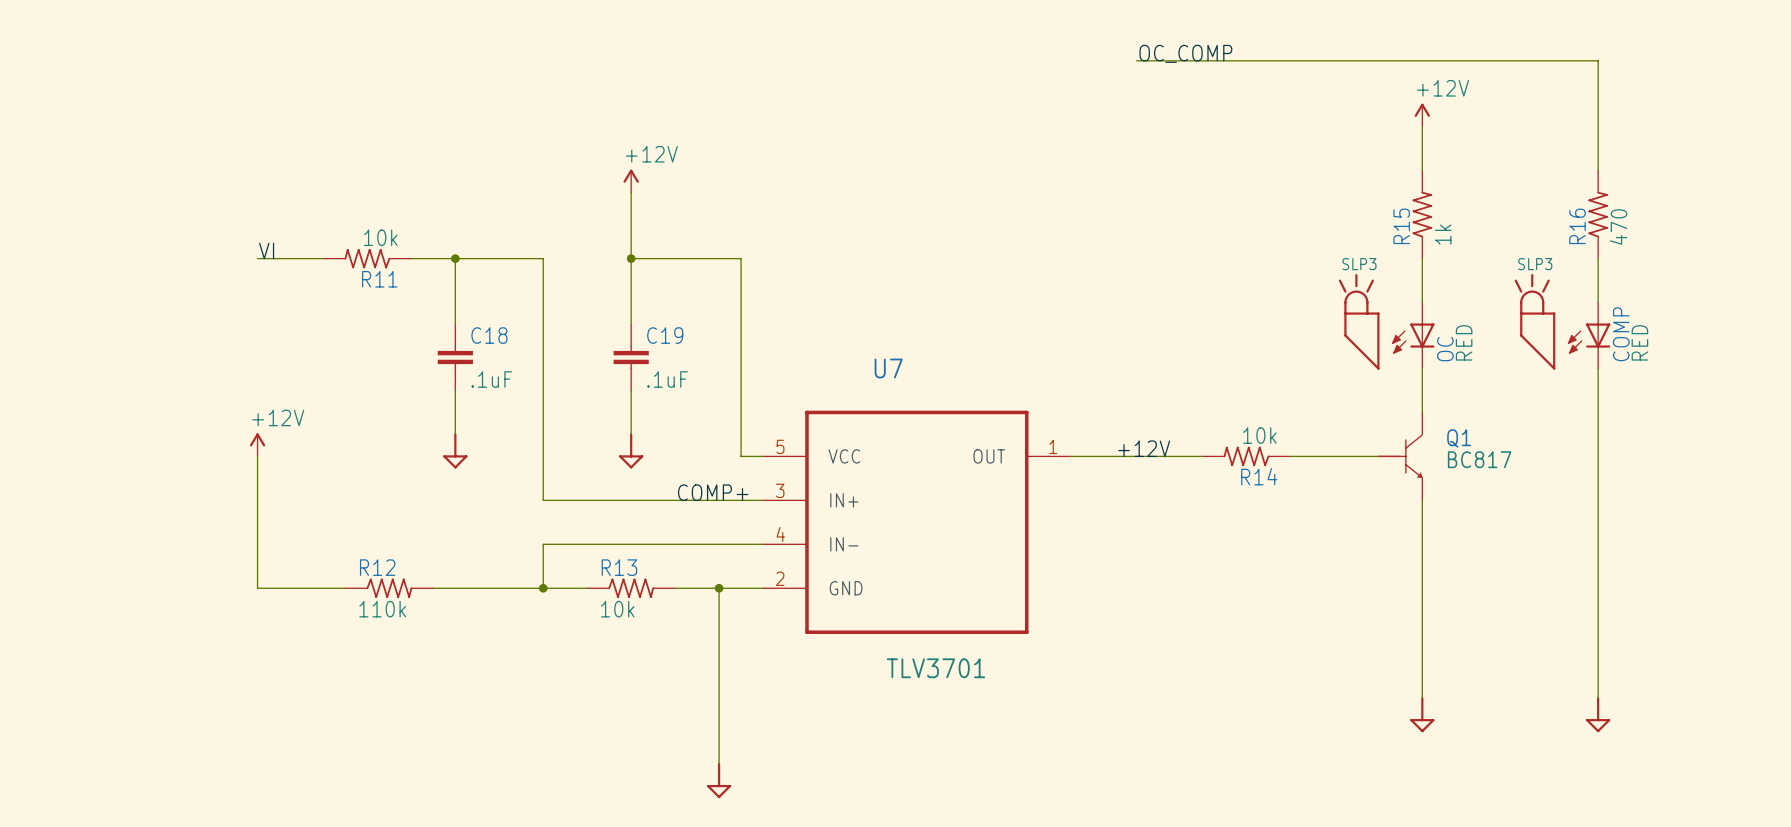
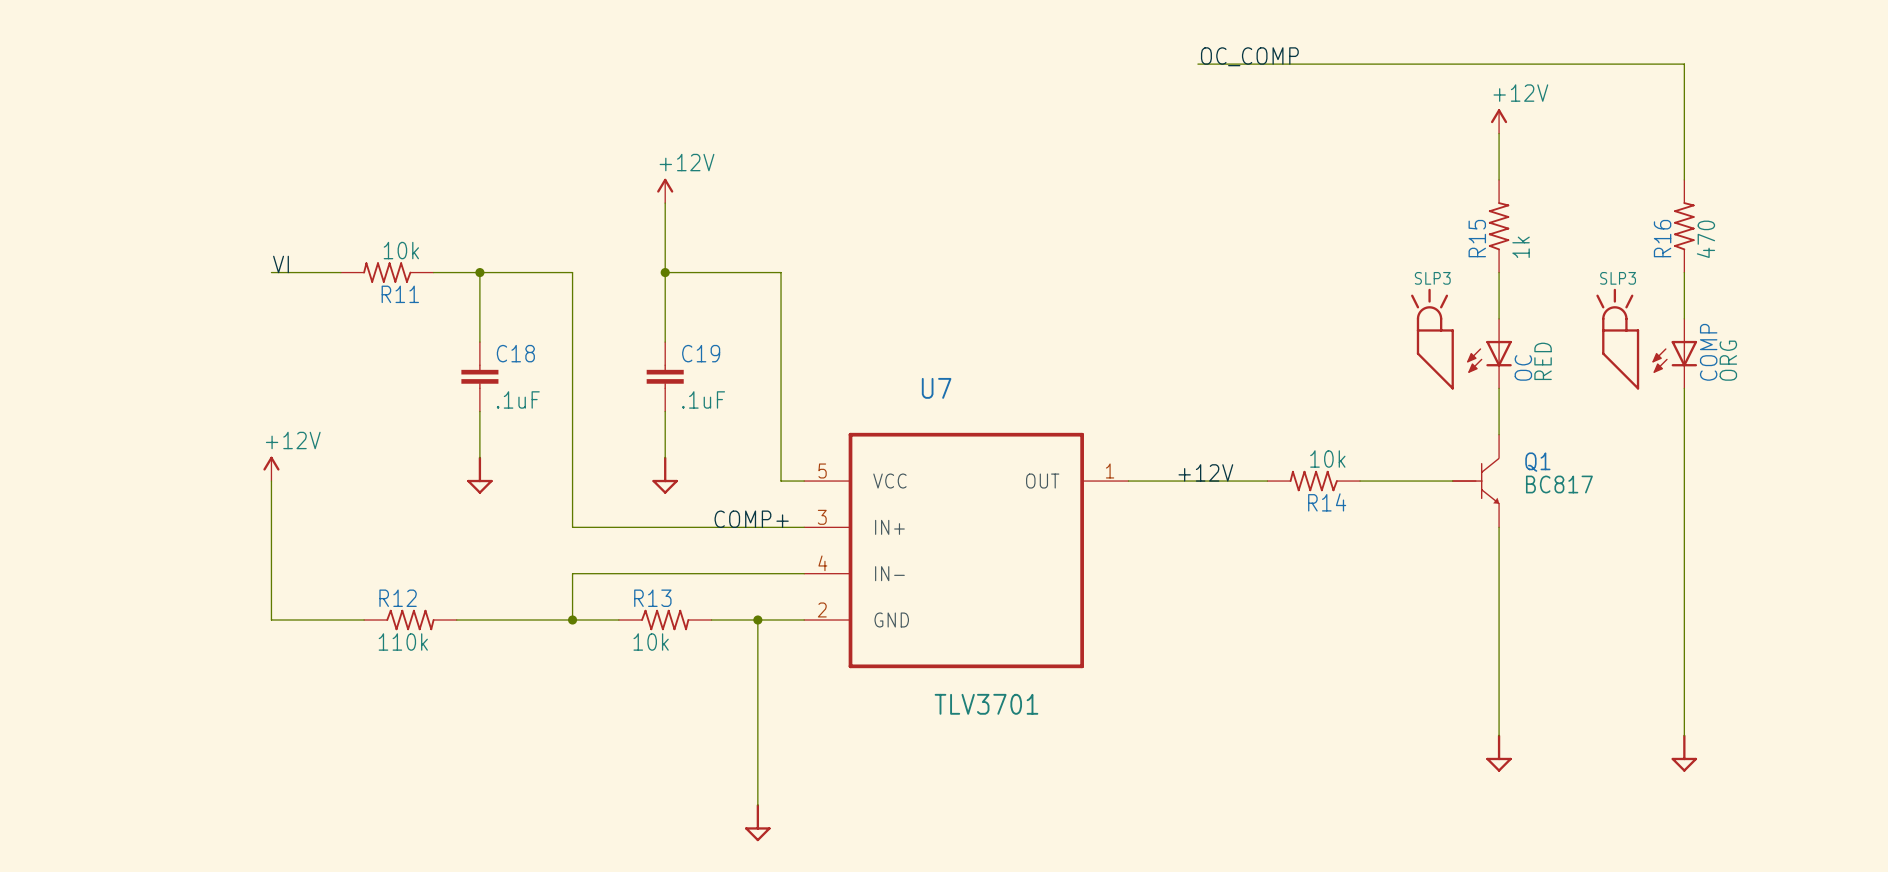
COMP value: RED (1639, 342) -> ORG (1728, 360)

